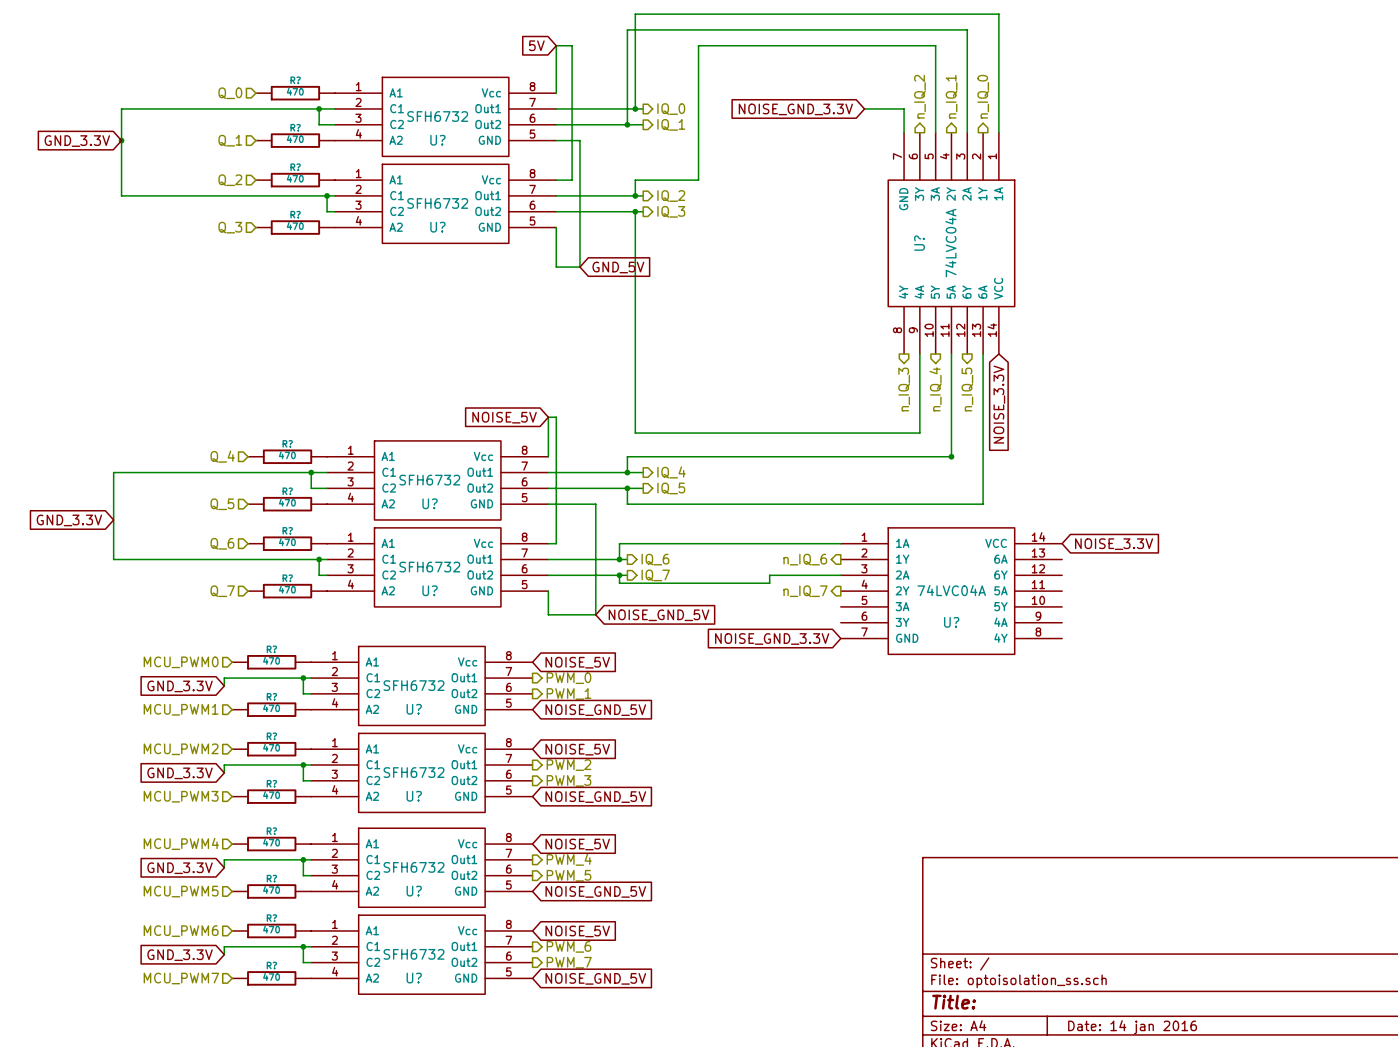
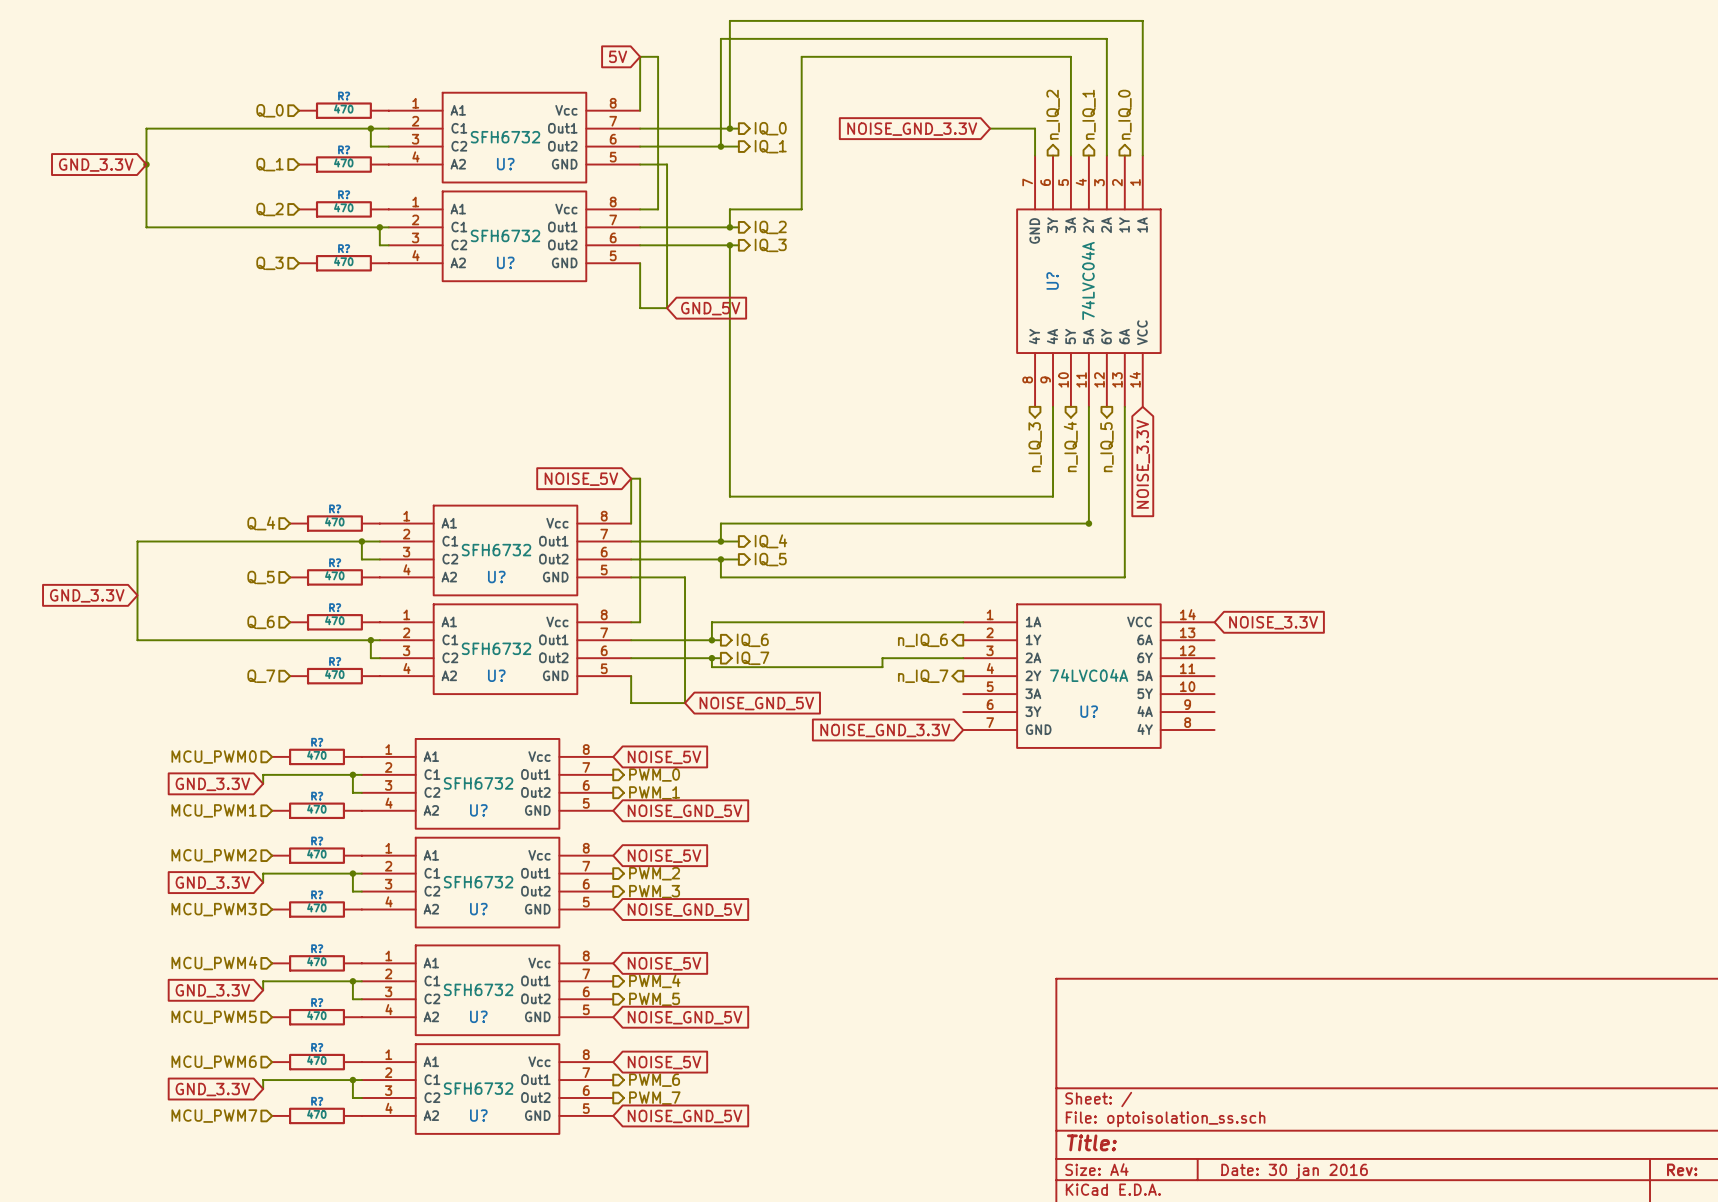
title block: Date: 14 jan 2016 (1132, 1027) -> Date: 30 jan 2016 (1294, 1171)

